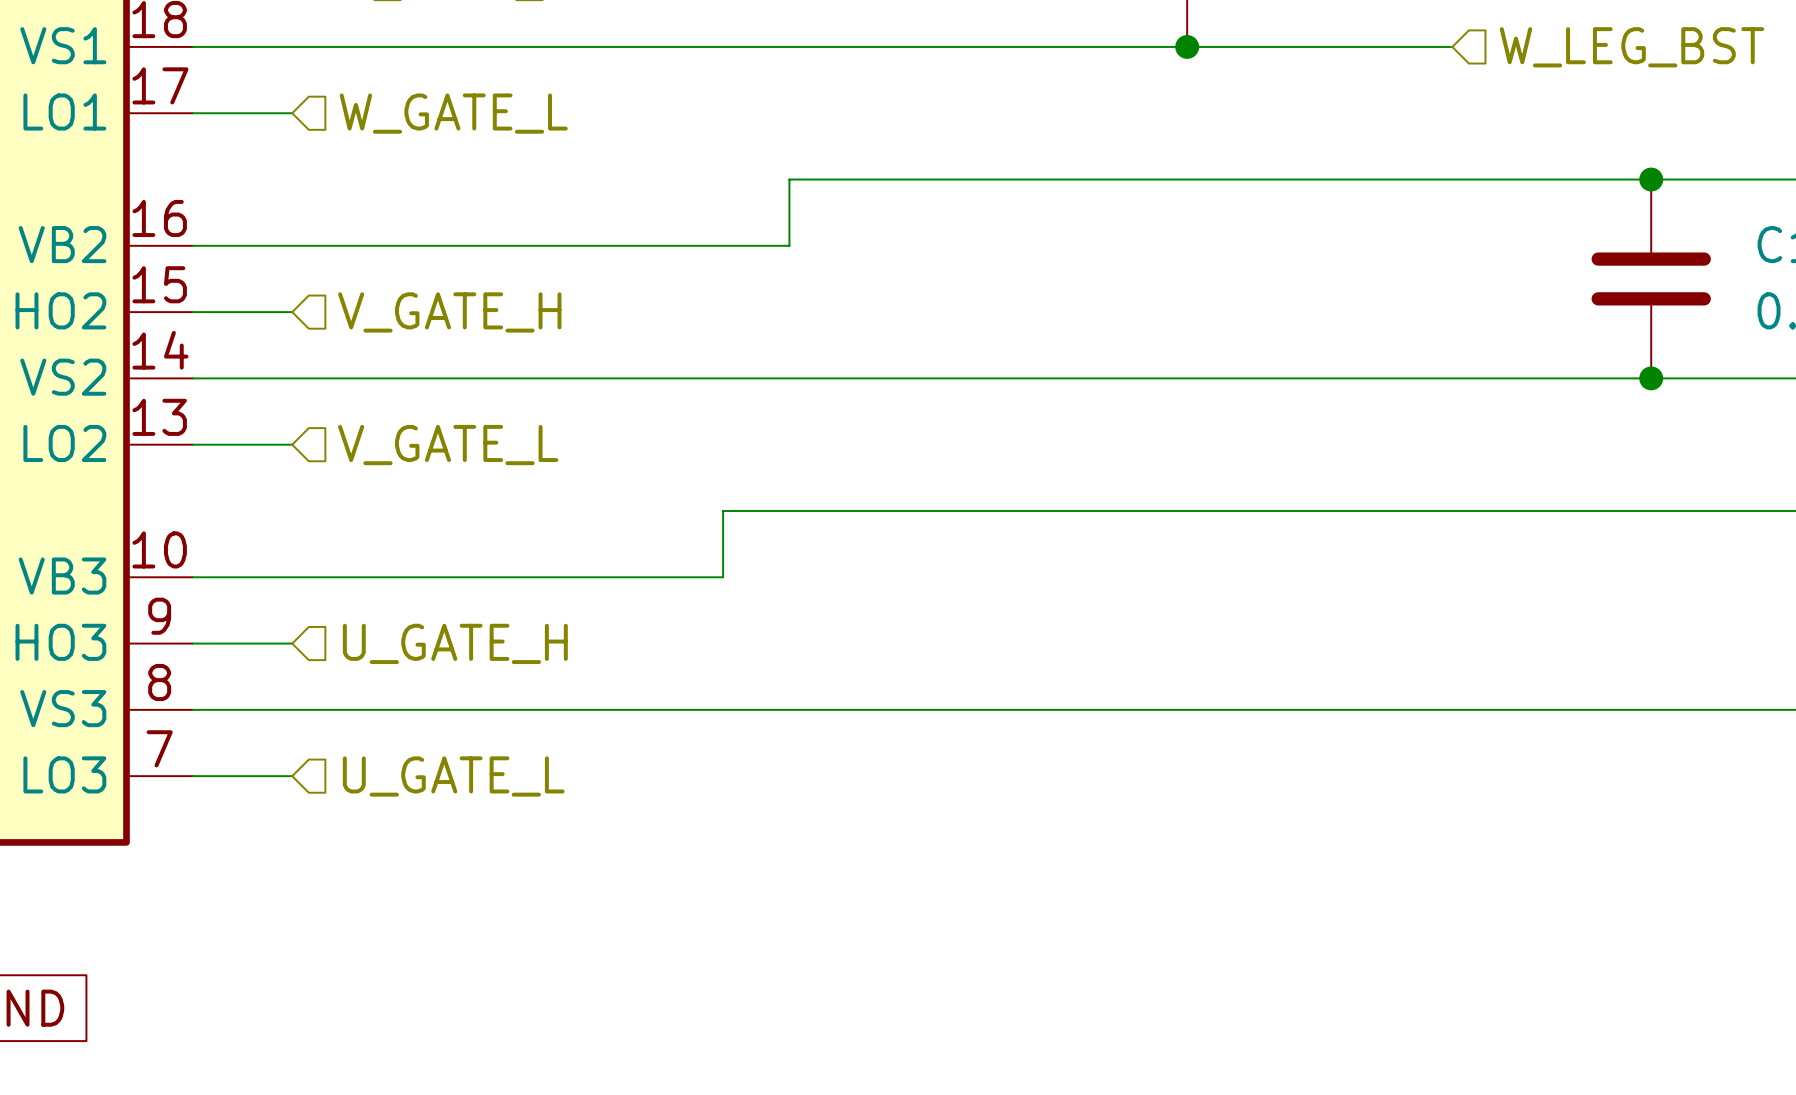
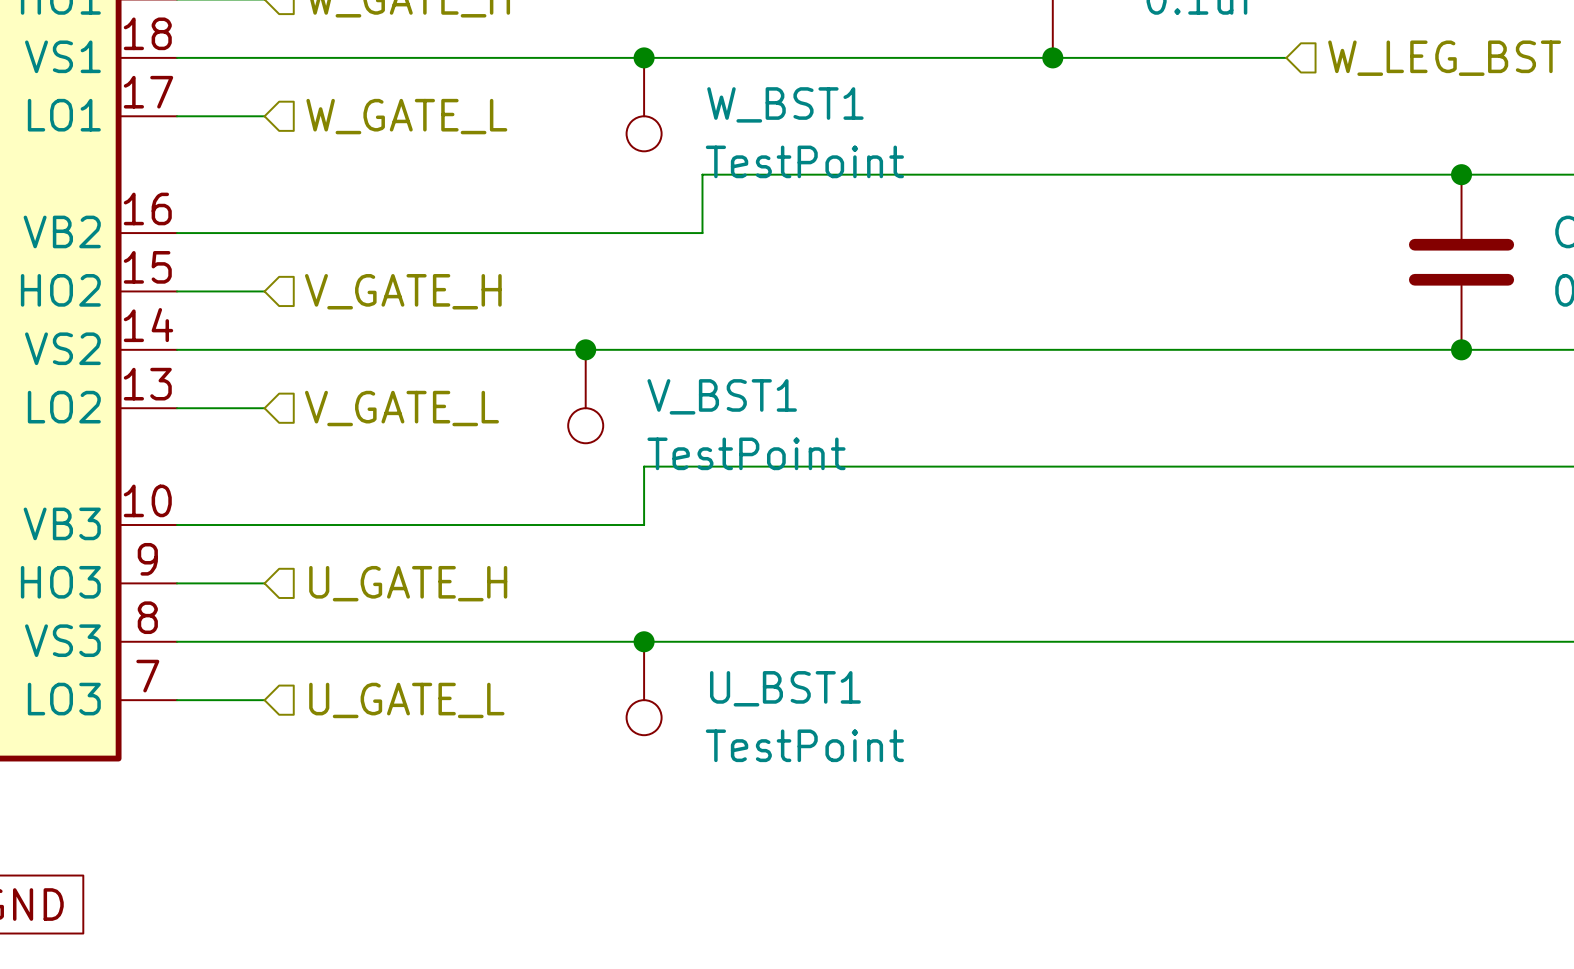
junction: none -> (644, 57)
W_BST1: none -> TestPoint (644, 104)
junction: none -> (585, 349)
V_BST1: none -> TestPoint (585, 396)
junction: none -> (644, 641)
U_BST1: none -> TestPoint (644, 688)

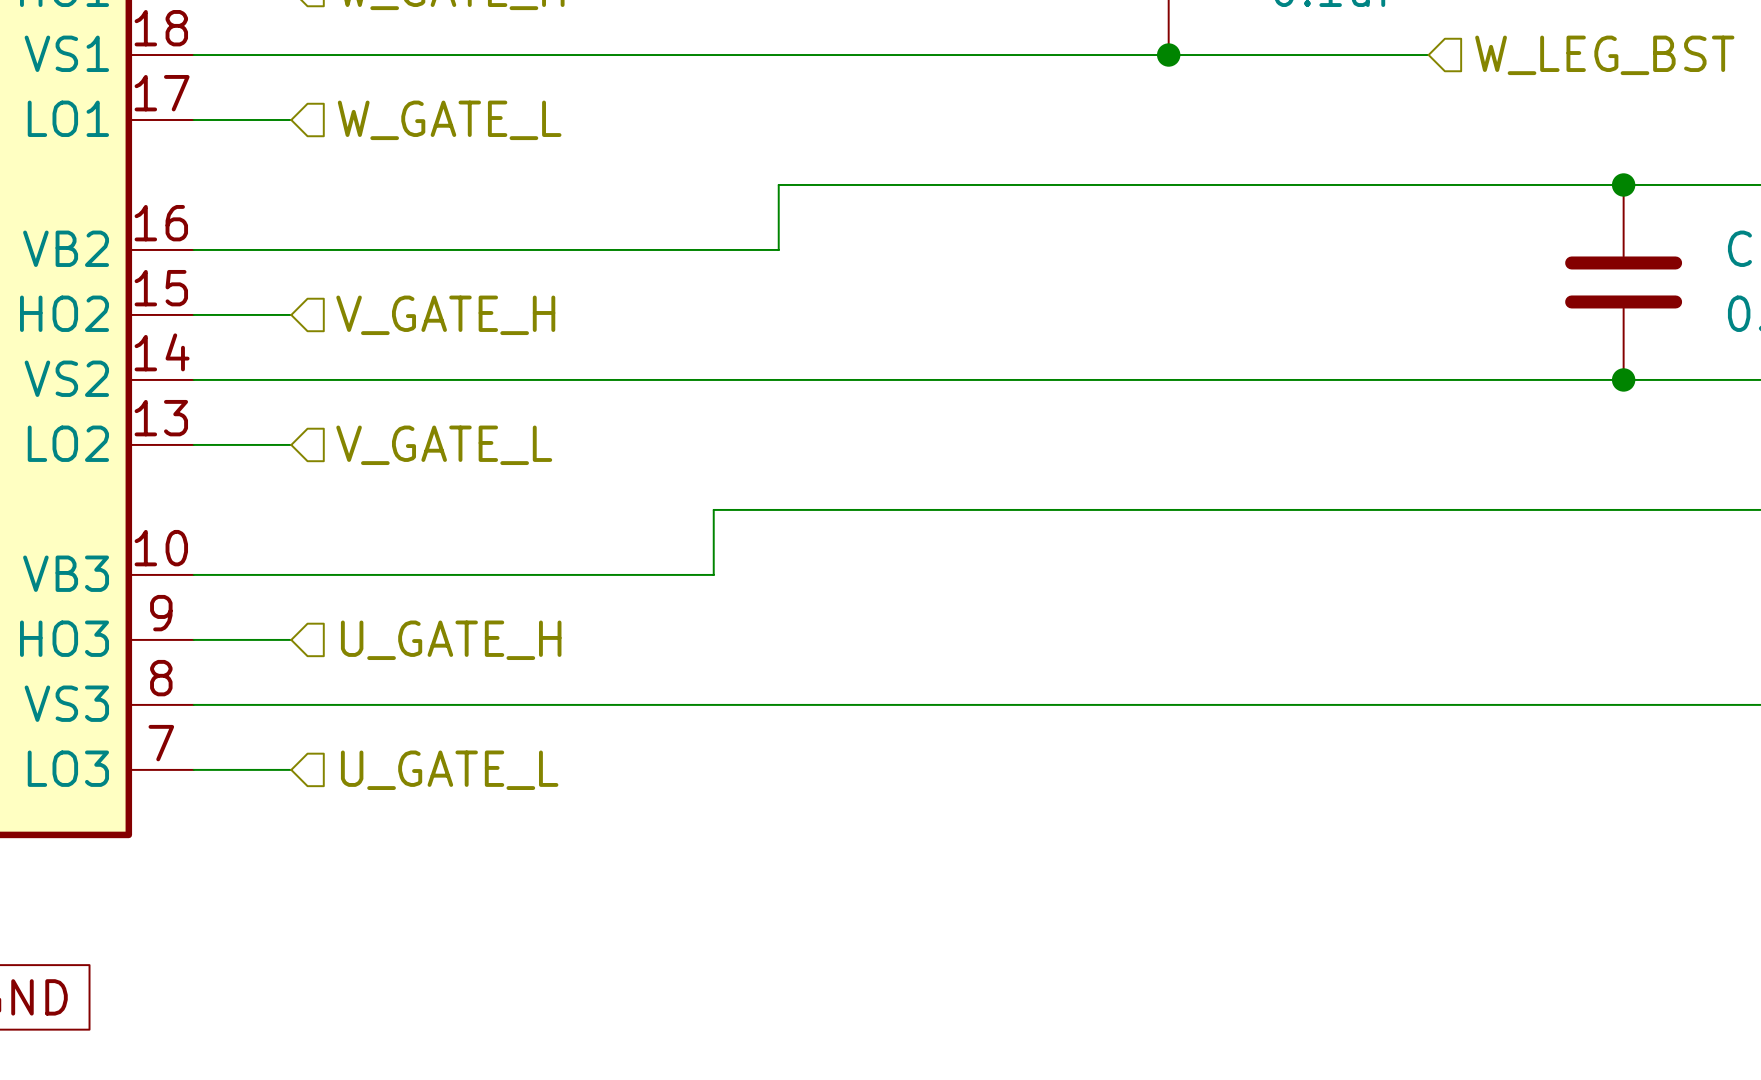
junction: (644, 57) -> none
W_BST1: TestPoint (644, 104) -> none
junction: (585, 349) -> none
V_BST1: TestPoint (585, 396) -> none
junction: (644, 641) -> none
U_BST1: TestPoint (644, 688) -> none

